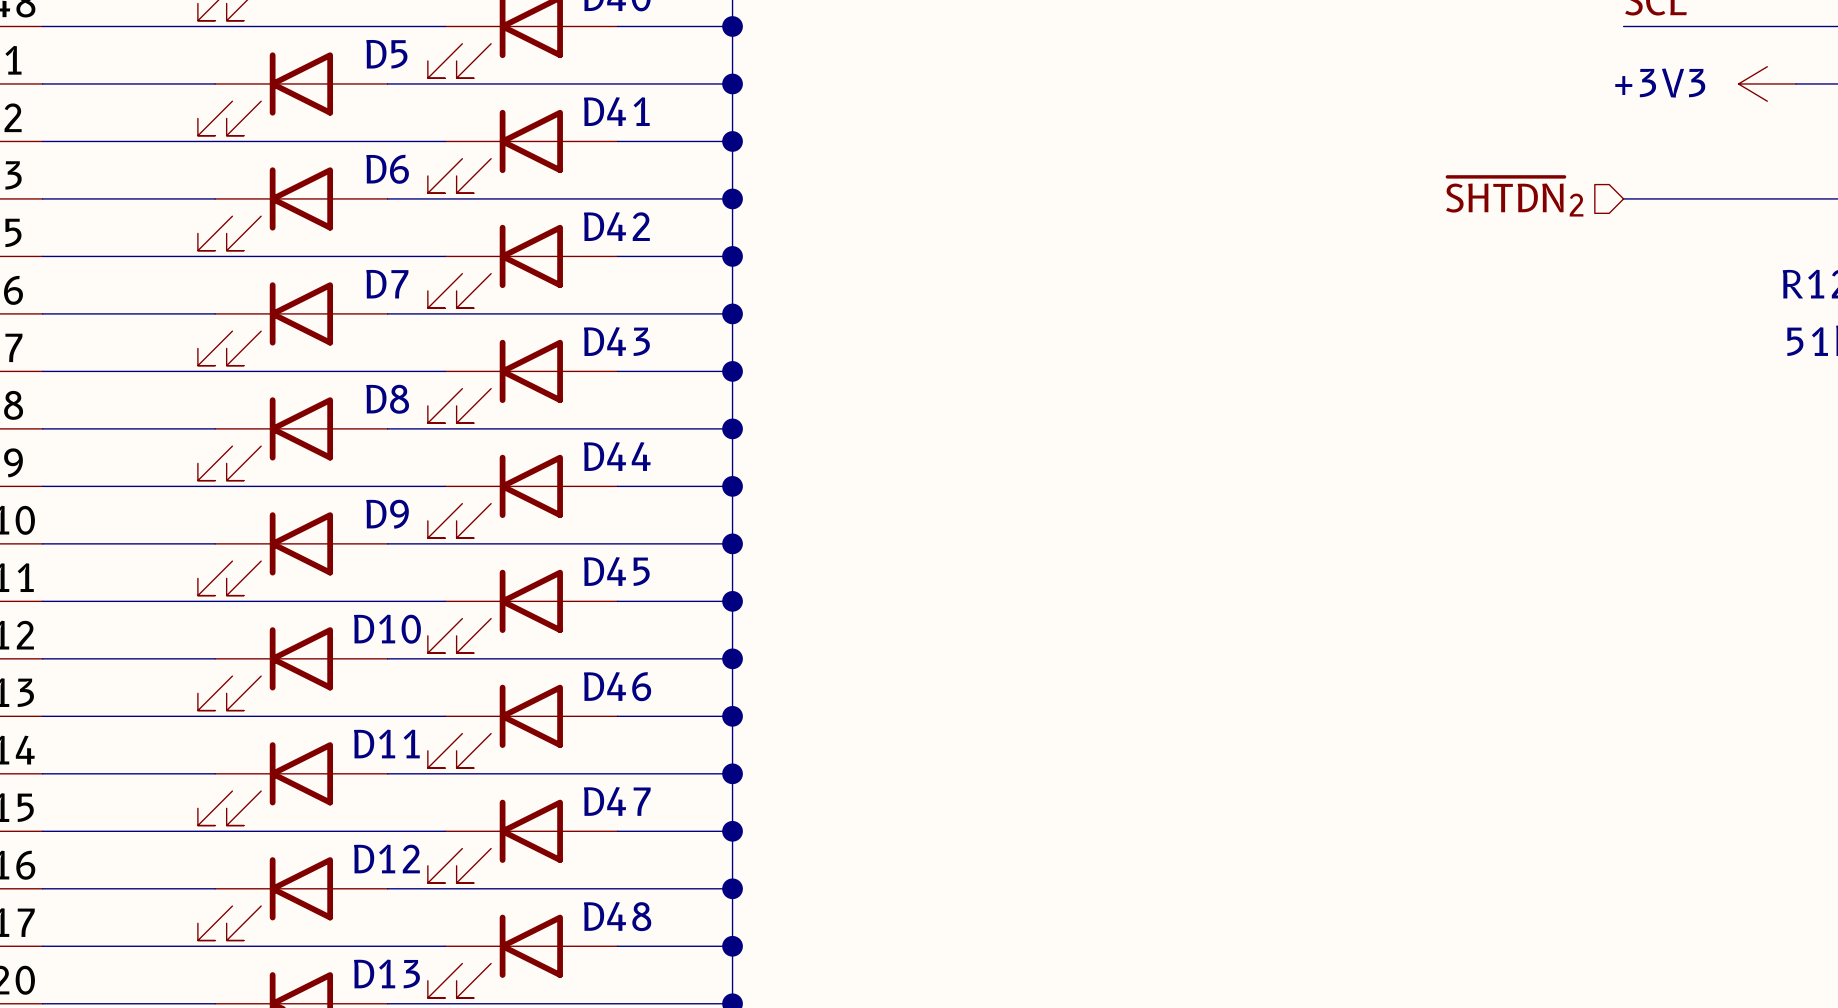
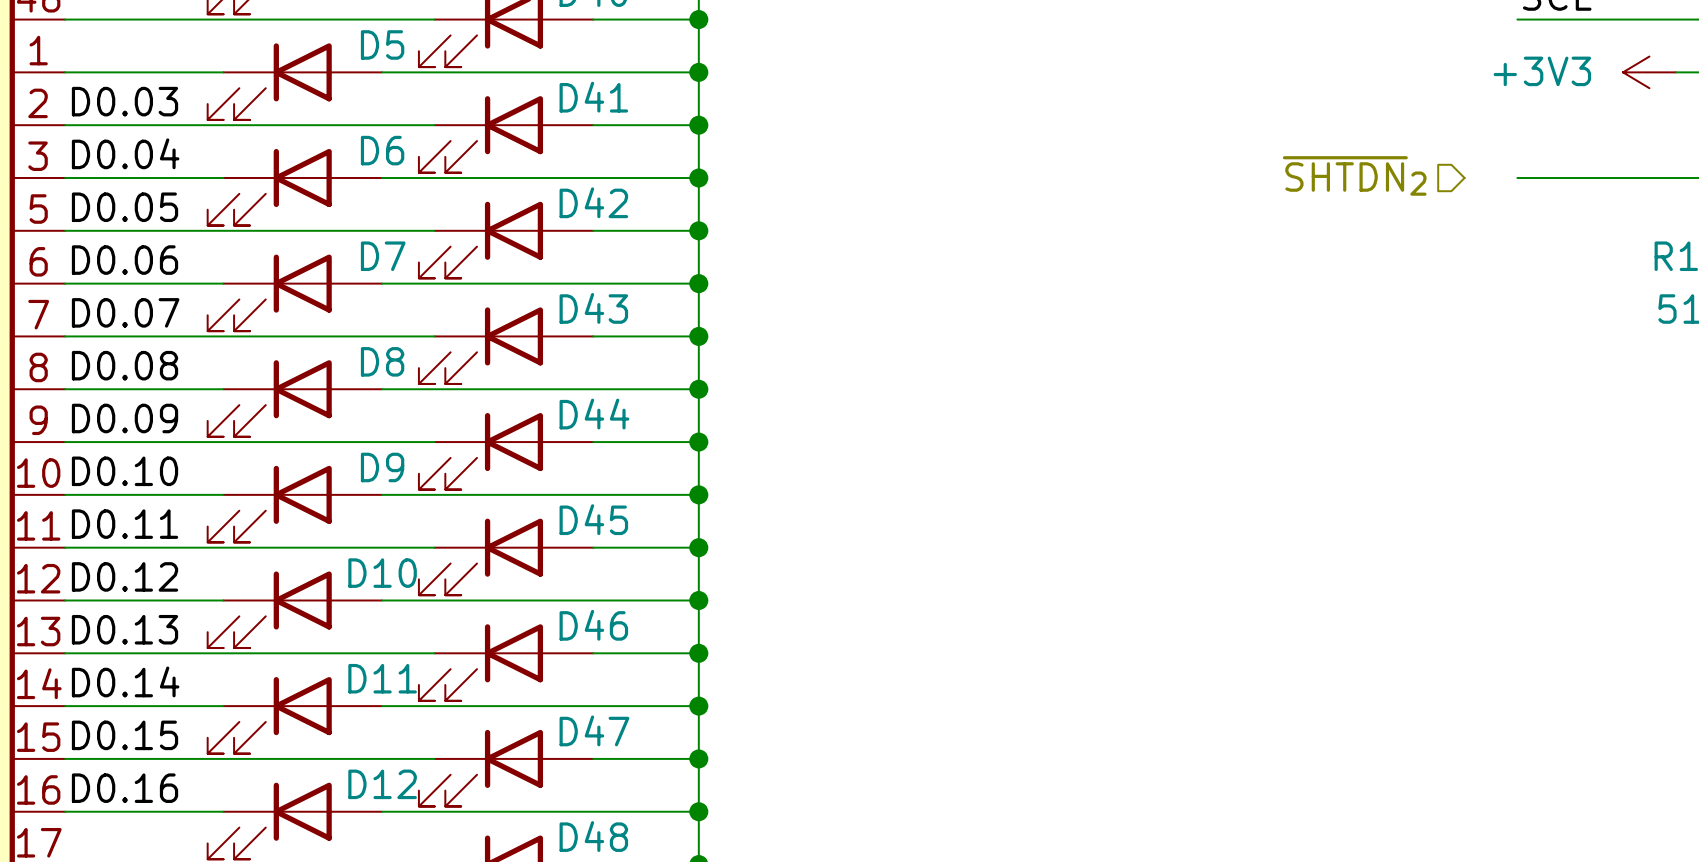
label: none -> D0.03 (125, 101)
label: none -> D0.04 (125, 153)
hierarchical label position: ~{SHTDN}2 (1514, 196) -> ~{SHTDN}2 (1354, 175)
label: none -> D0.05 (125, 207)
label: none -> D0.06 (125, 260)
label: none -> D0.07 (125, 312)
label: none -> D0.08 (125, 365)
label: none -> D0.09 (125, 418)
label: none -> D0.10 (125, 471)
label: none -> D0.11 (125, 524)
label: none -> D0.12 (125, 576)
label: none -> D0.13 (125, 629)
label: none -> D0.14 (125, 681)
label: none -> D0.15 (125, 735)
label: none -> D0.16 (125, 788)

